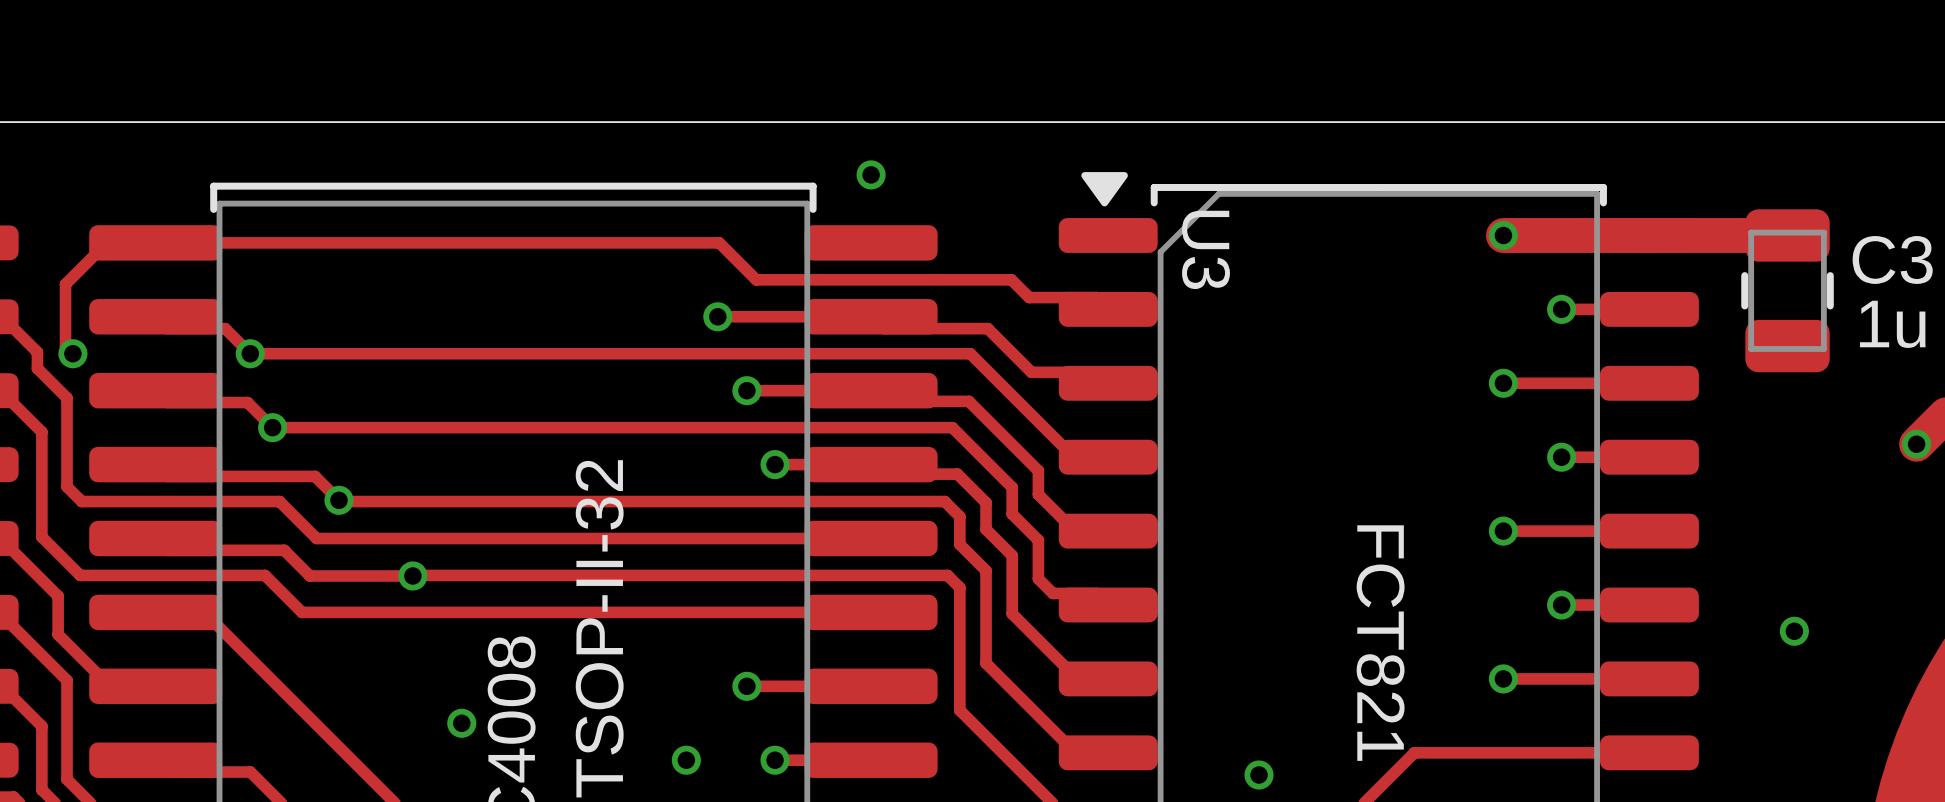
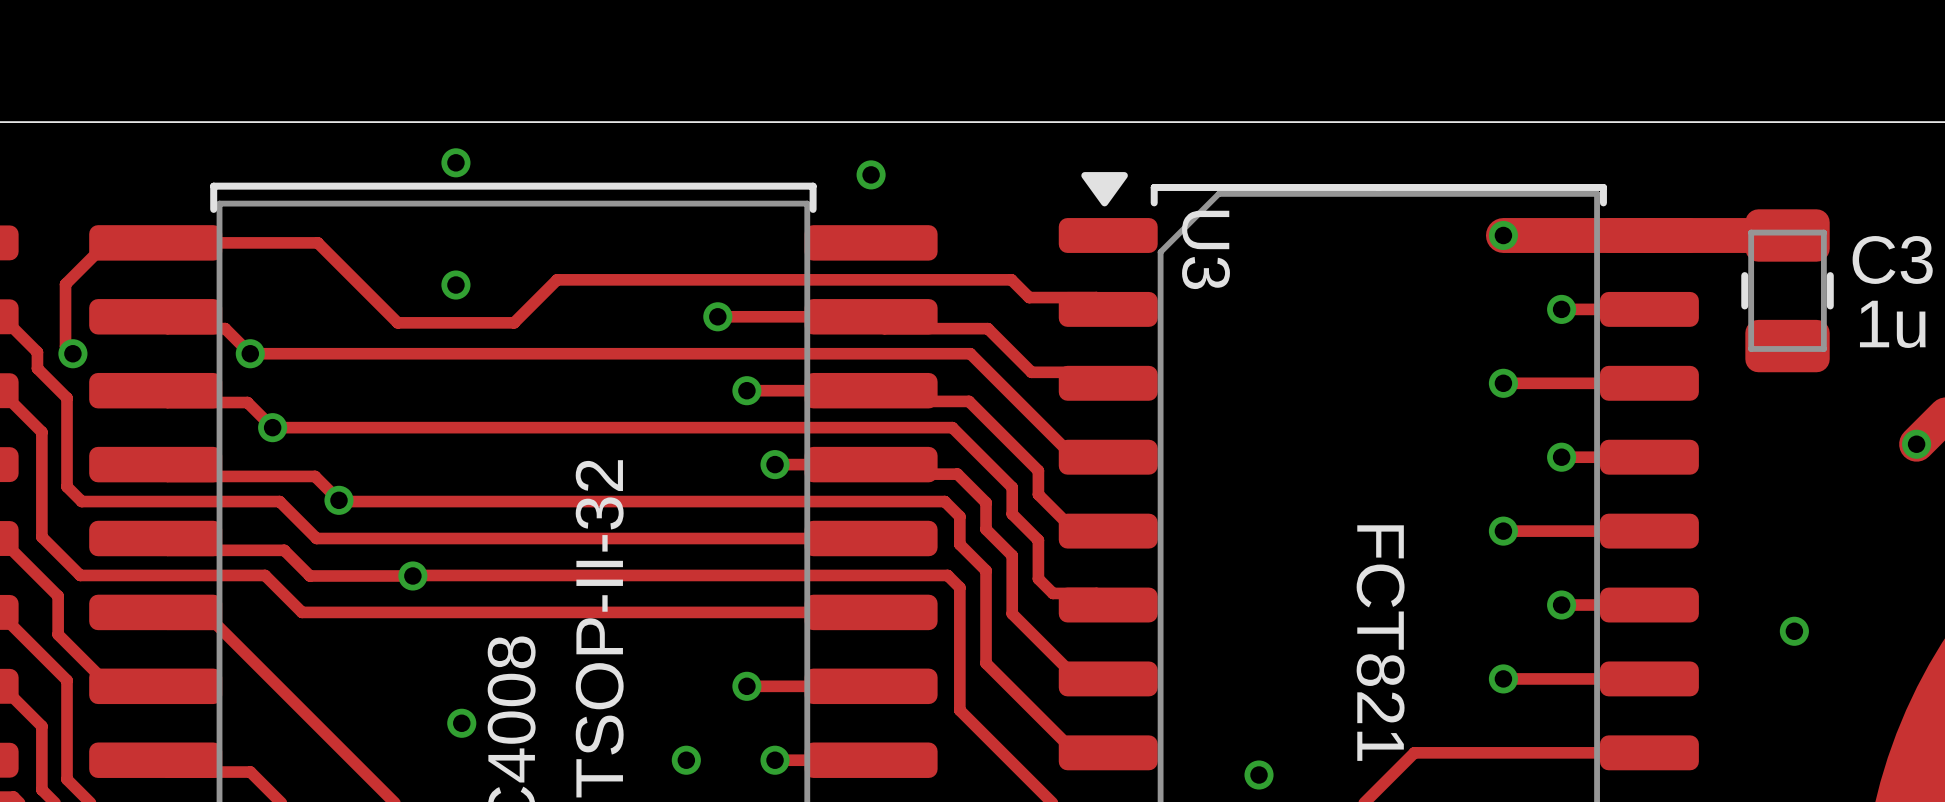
via: none -> (455, 162)
track: (317, 242) (719, 242) (756, 279) -> (317, 242) (397, 322) (514, 322) (557, 279) (756, 279)
via: none -> (455, 285)

